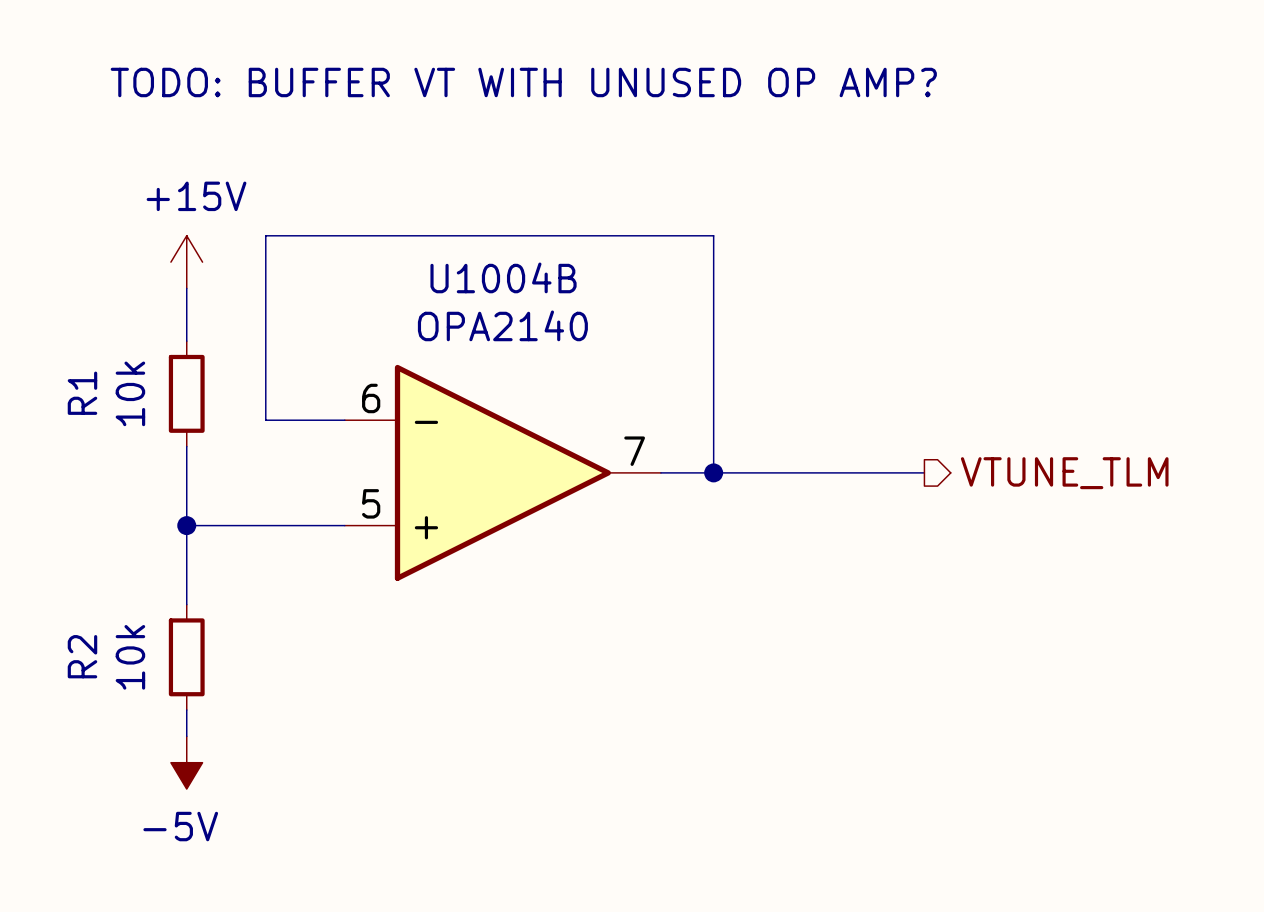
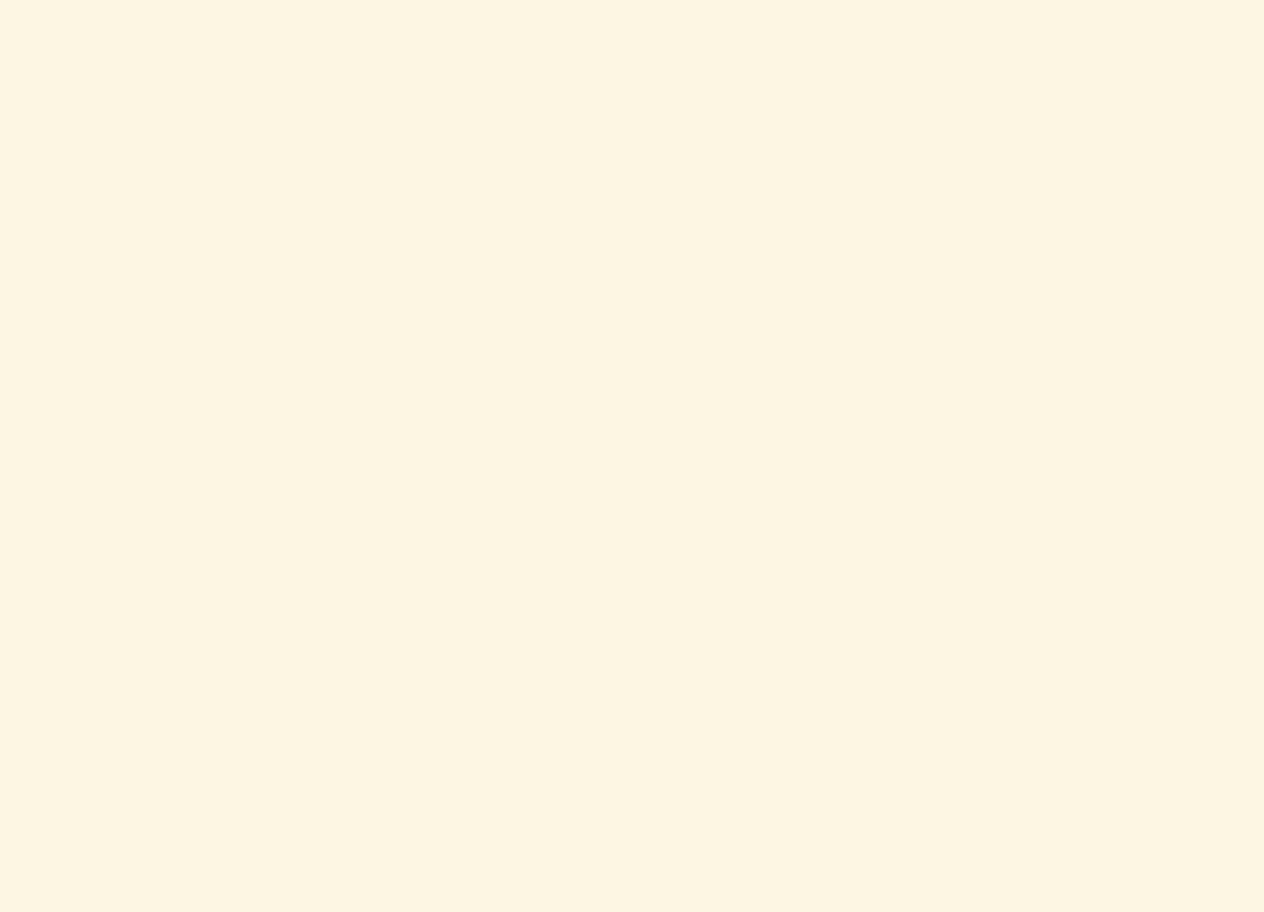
text: TODO: BUFFER VT WITH UNUSED OP AMP? (523, 82) -> none
power symbol: +15V (186, 262) -> none
wire: (186, 288) (186, 341) -> none
R1: 10k (186, 393) -> none
wire: (344, 420) (265, 420) (265, 235) (713, 235) (713, 472) -> none
wire: (186, 446) (186, 604) -> none
U1004B: OPA2140 (502, 472) -> none
wire: (660, 472) (924, 472) -> none
junction: (713, 472) -> none
hierarchical label: VTUNE_TLM (1064, 473) -> none
wire: (186, 525) (344, 525) -> none
junction: (186, 525) -> none
R2: 10k (186, 657) -> none
wire: (186, 710) (186, 736) -> none
power symbol: -5V (186, 762) -> none

